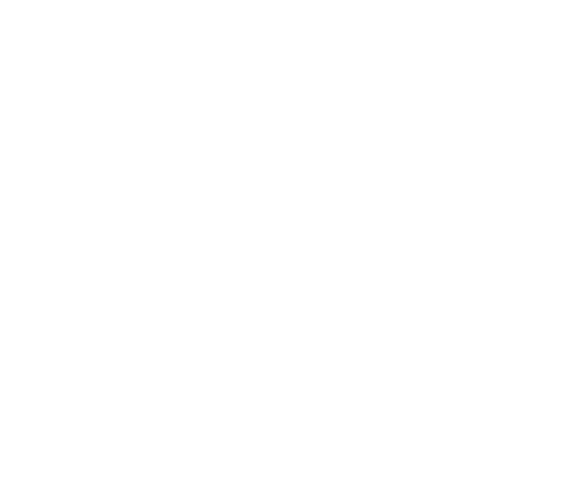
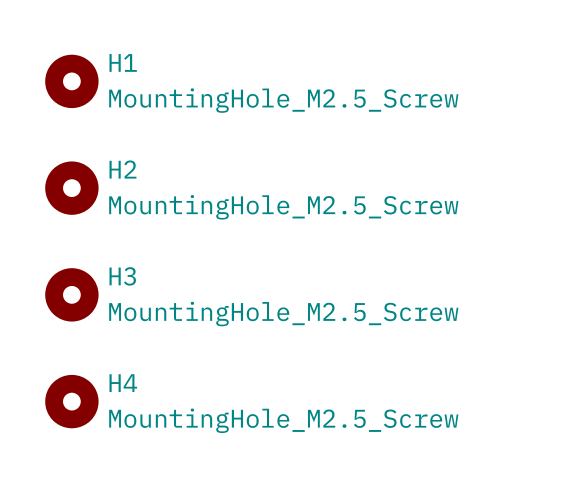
H1: none -> MountingHole_M2.5_Screw (71, 81)
H2: none -> MountingHole_M2.5_Screw (71, 188)
H3: none -> MountingHole_M2.5_Screw (71, 294)
H4: none -> MountingHole_M2.5_Screw (71, 401)

